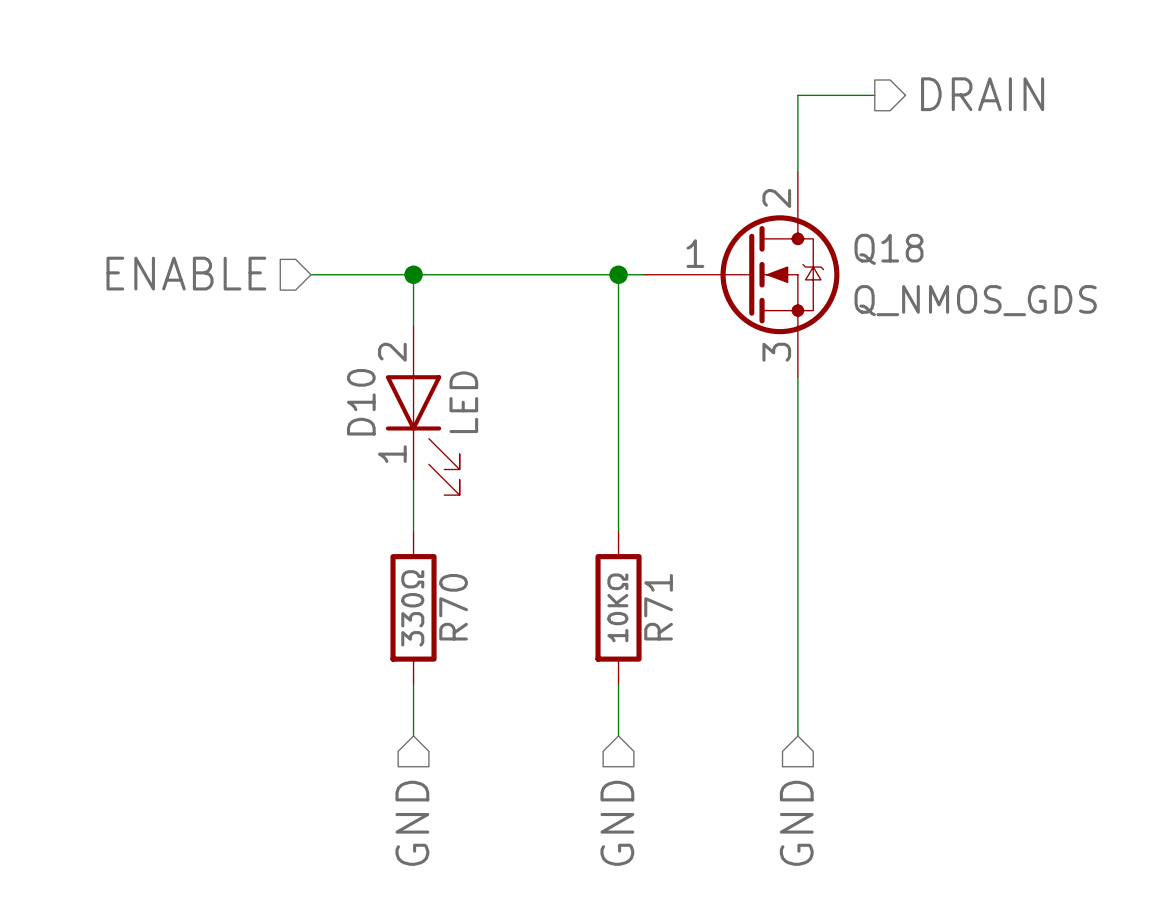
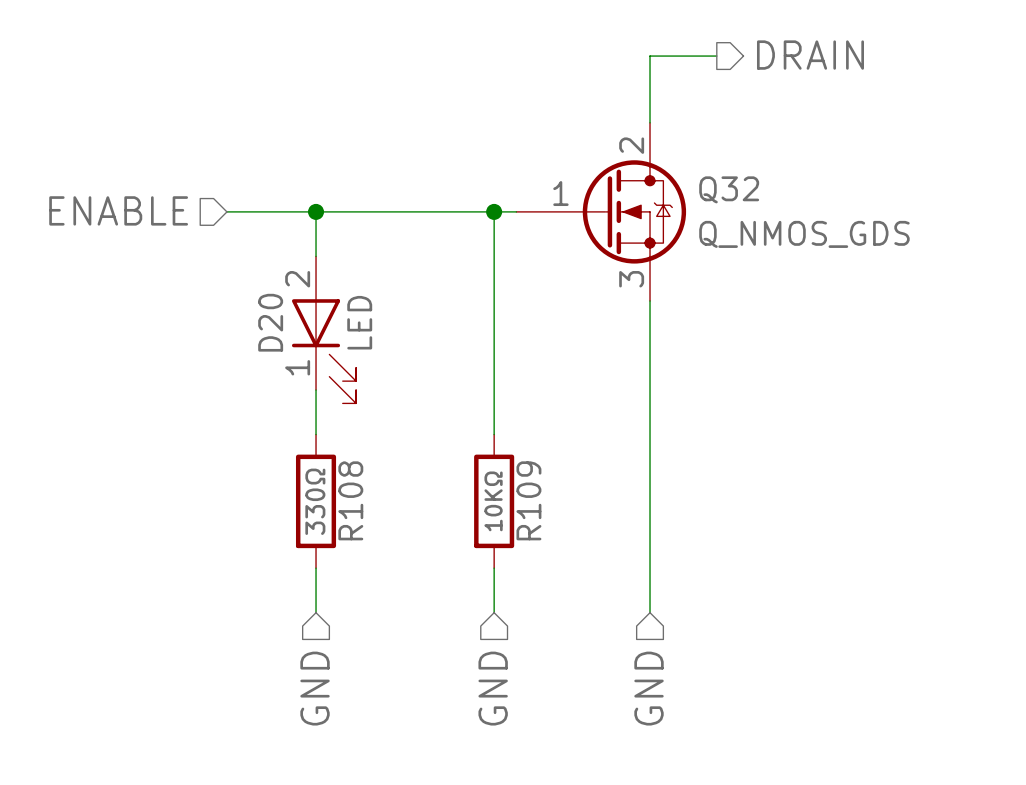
Q18 name: Q18 (889, 249) -> Q32 (729, 189)
D10 name: D10 (361, 402) -> D20 (270, 322)
R70 name: R70 (453, 607) -> R108 (350, 500)
R71 name: R71 (658, 607) -> R109 (528, 500)

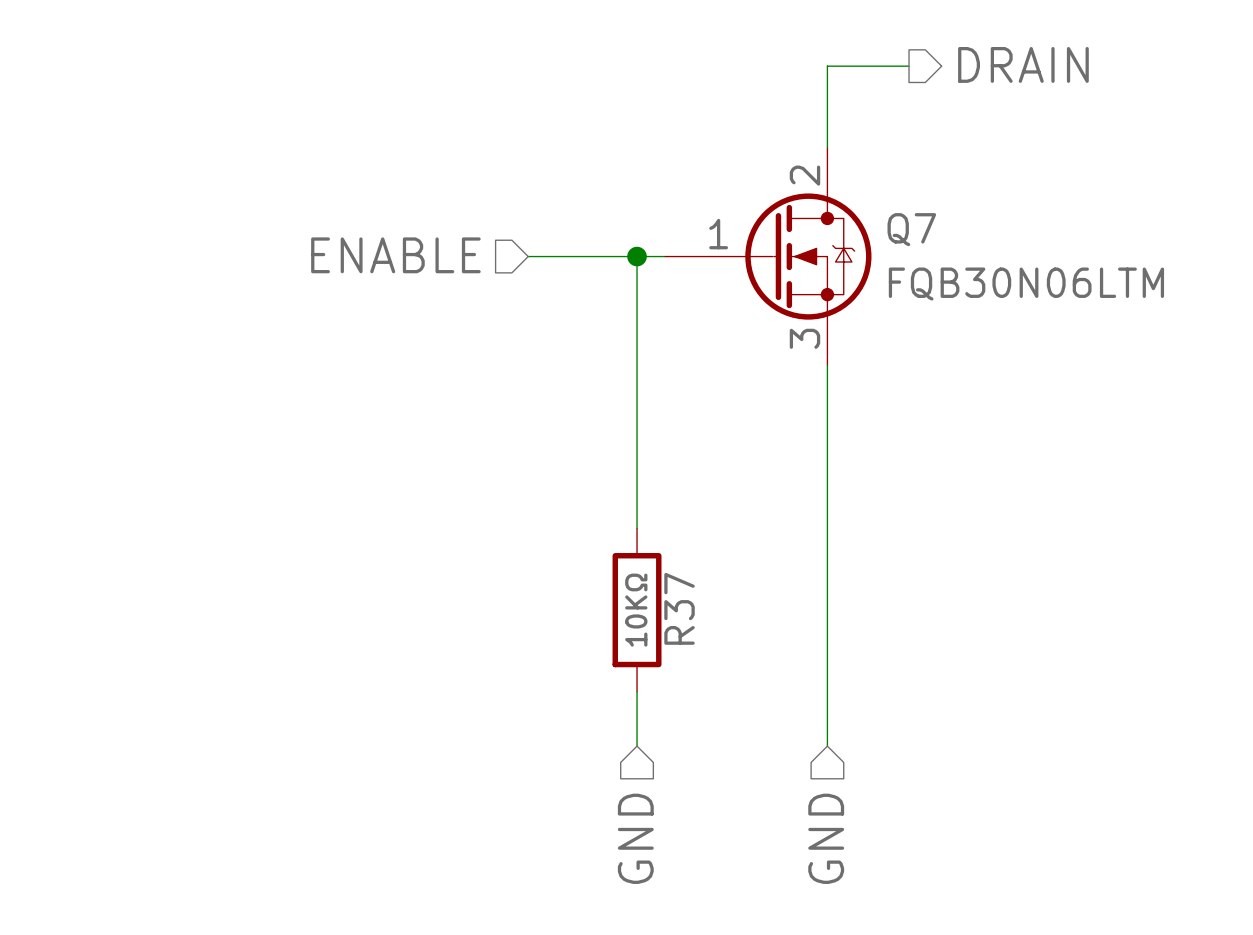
Q32 name: Q32 (729, 189) -> Q7 (911, 229)
hierarchical label position: ENABLE (118, 210) -> ENABLE (395, 255)
wire: (226, 211) (405, 211) -> none
wire: (316, 211) (316, 256) -> none
junction: (316, 211) -> none
Q32 value: Q_NMOS_GDS (804, 234) -> FQB30N06LTM (1026, 284)
D20: LED (324, 329) -> none
wire: (316, 390) (316, 434) -> none
R109 name: R109 (528, 500) -> R37 (679, 608)
R108: 330Ω (316, 501) -> none
wire: (316, 568) (316, 612) -> none
hierarchical label: GND (315, 688) -> none

